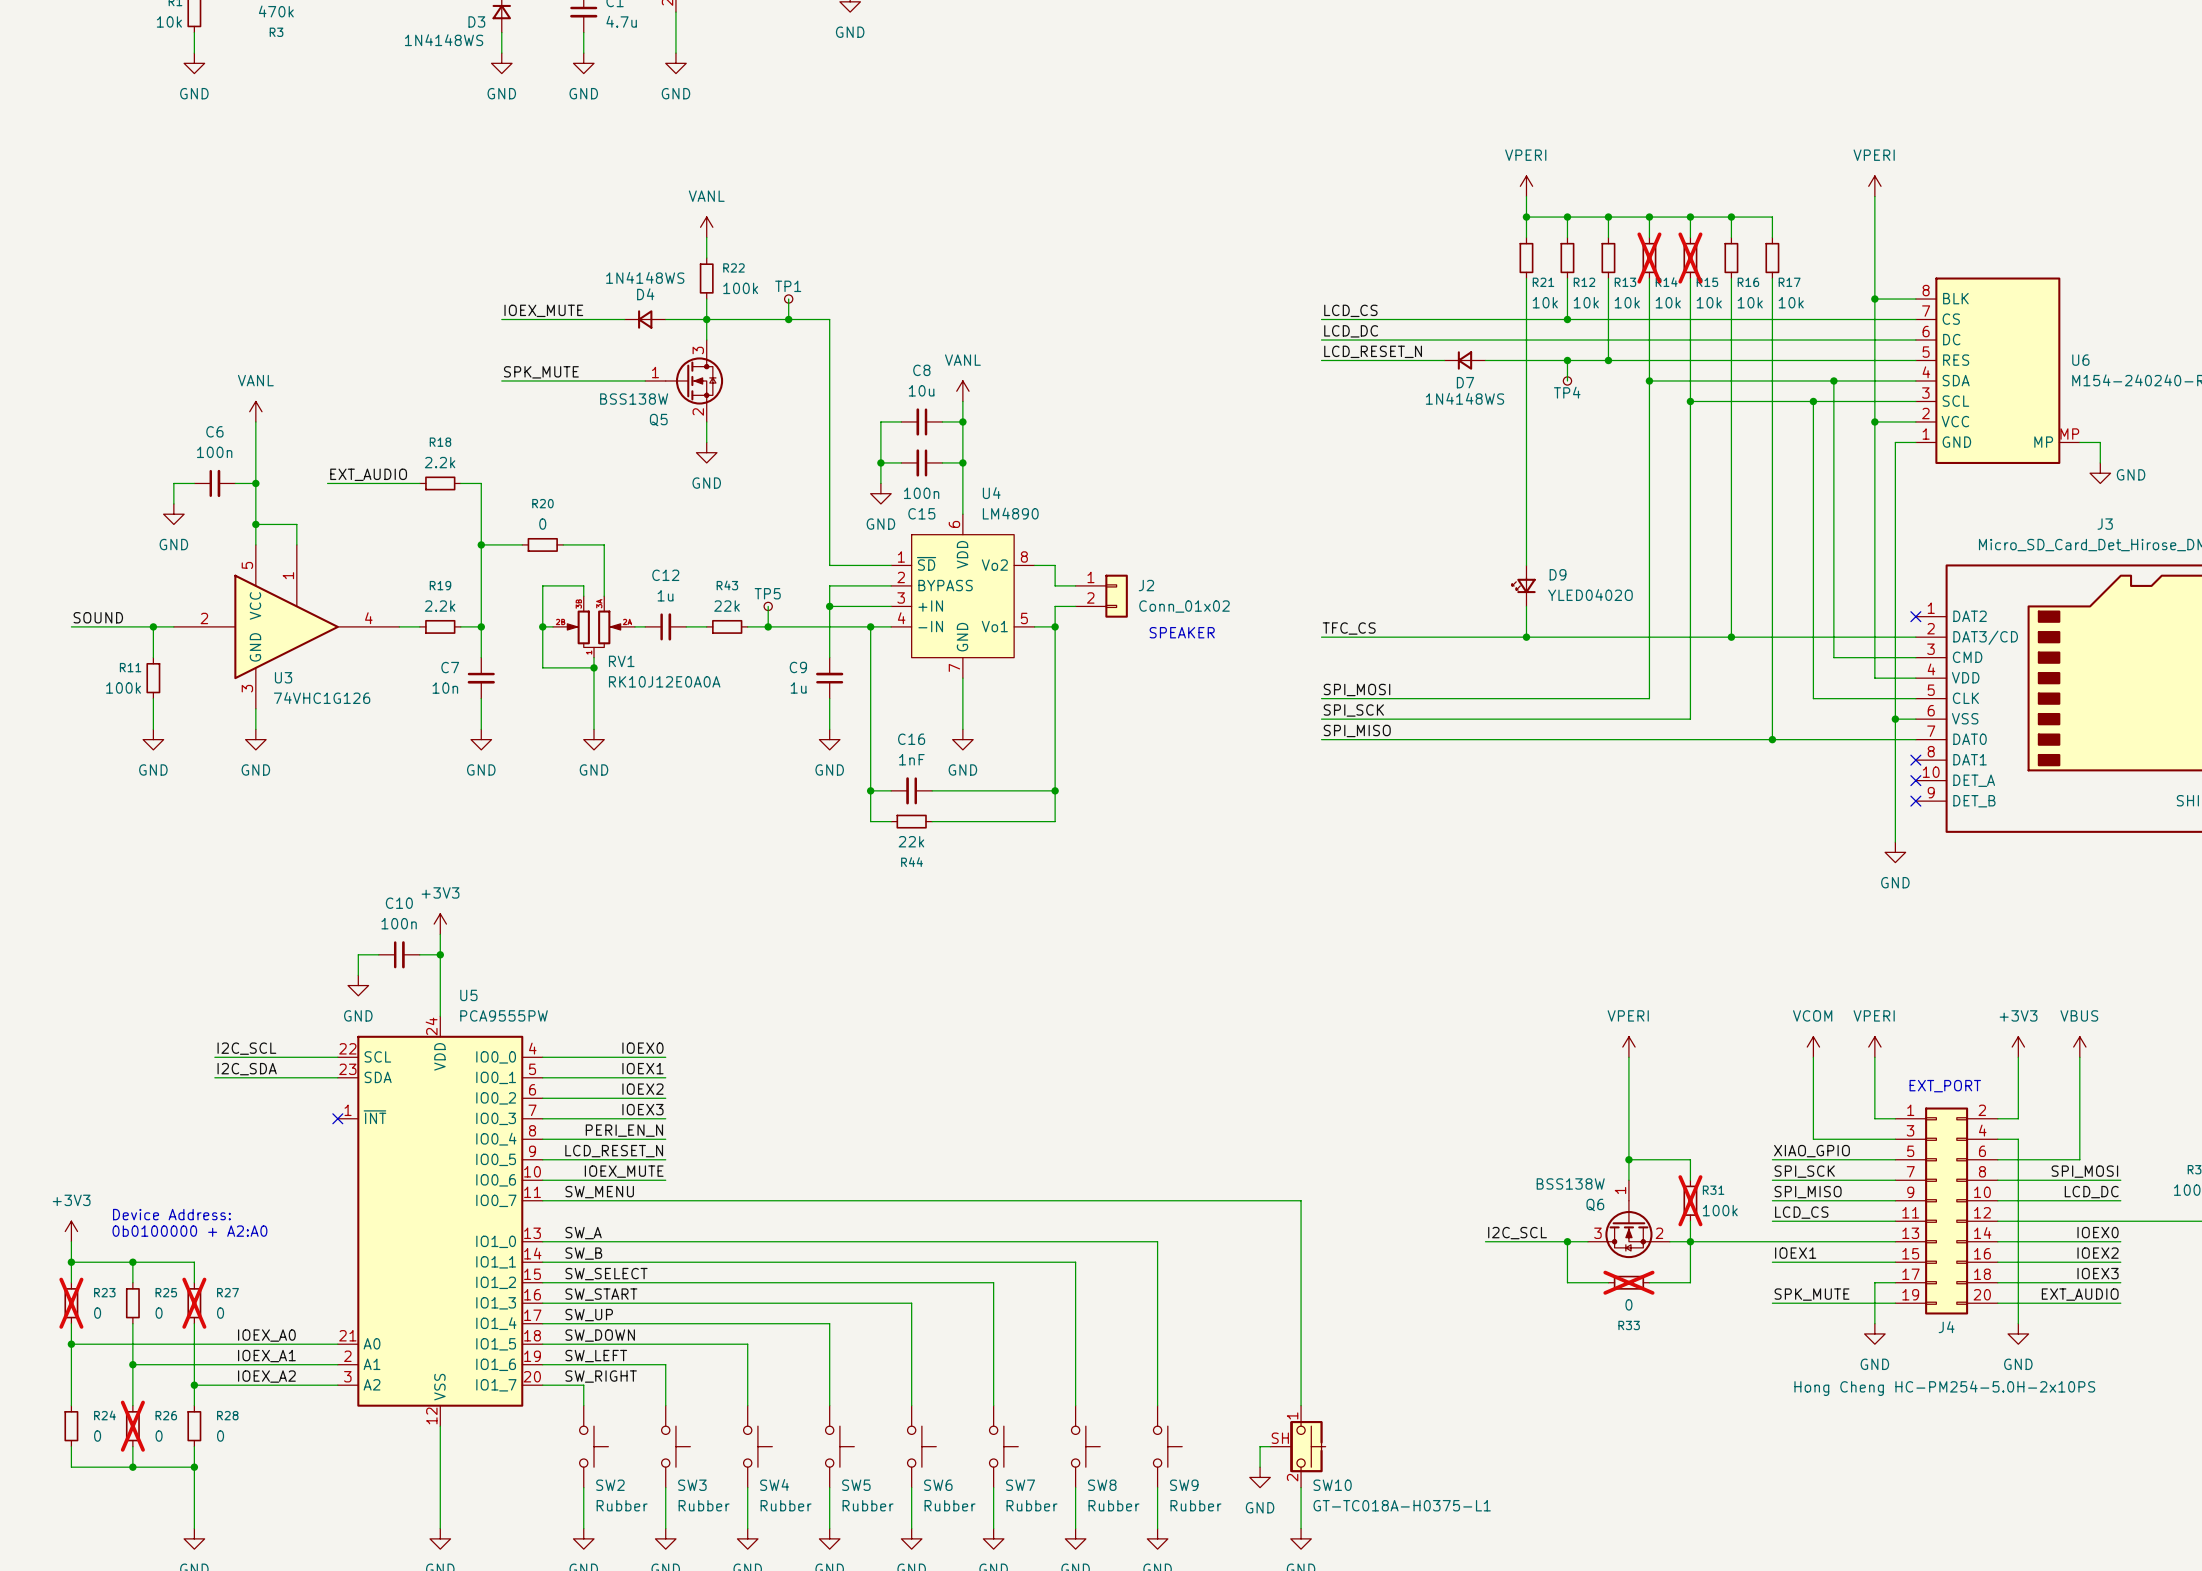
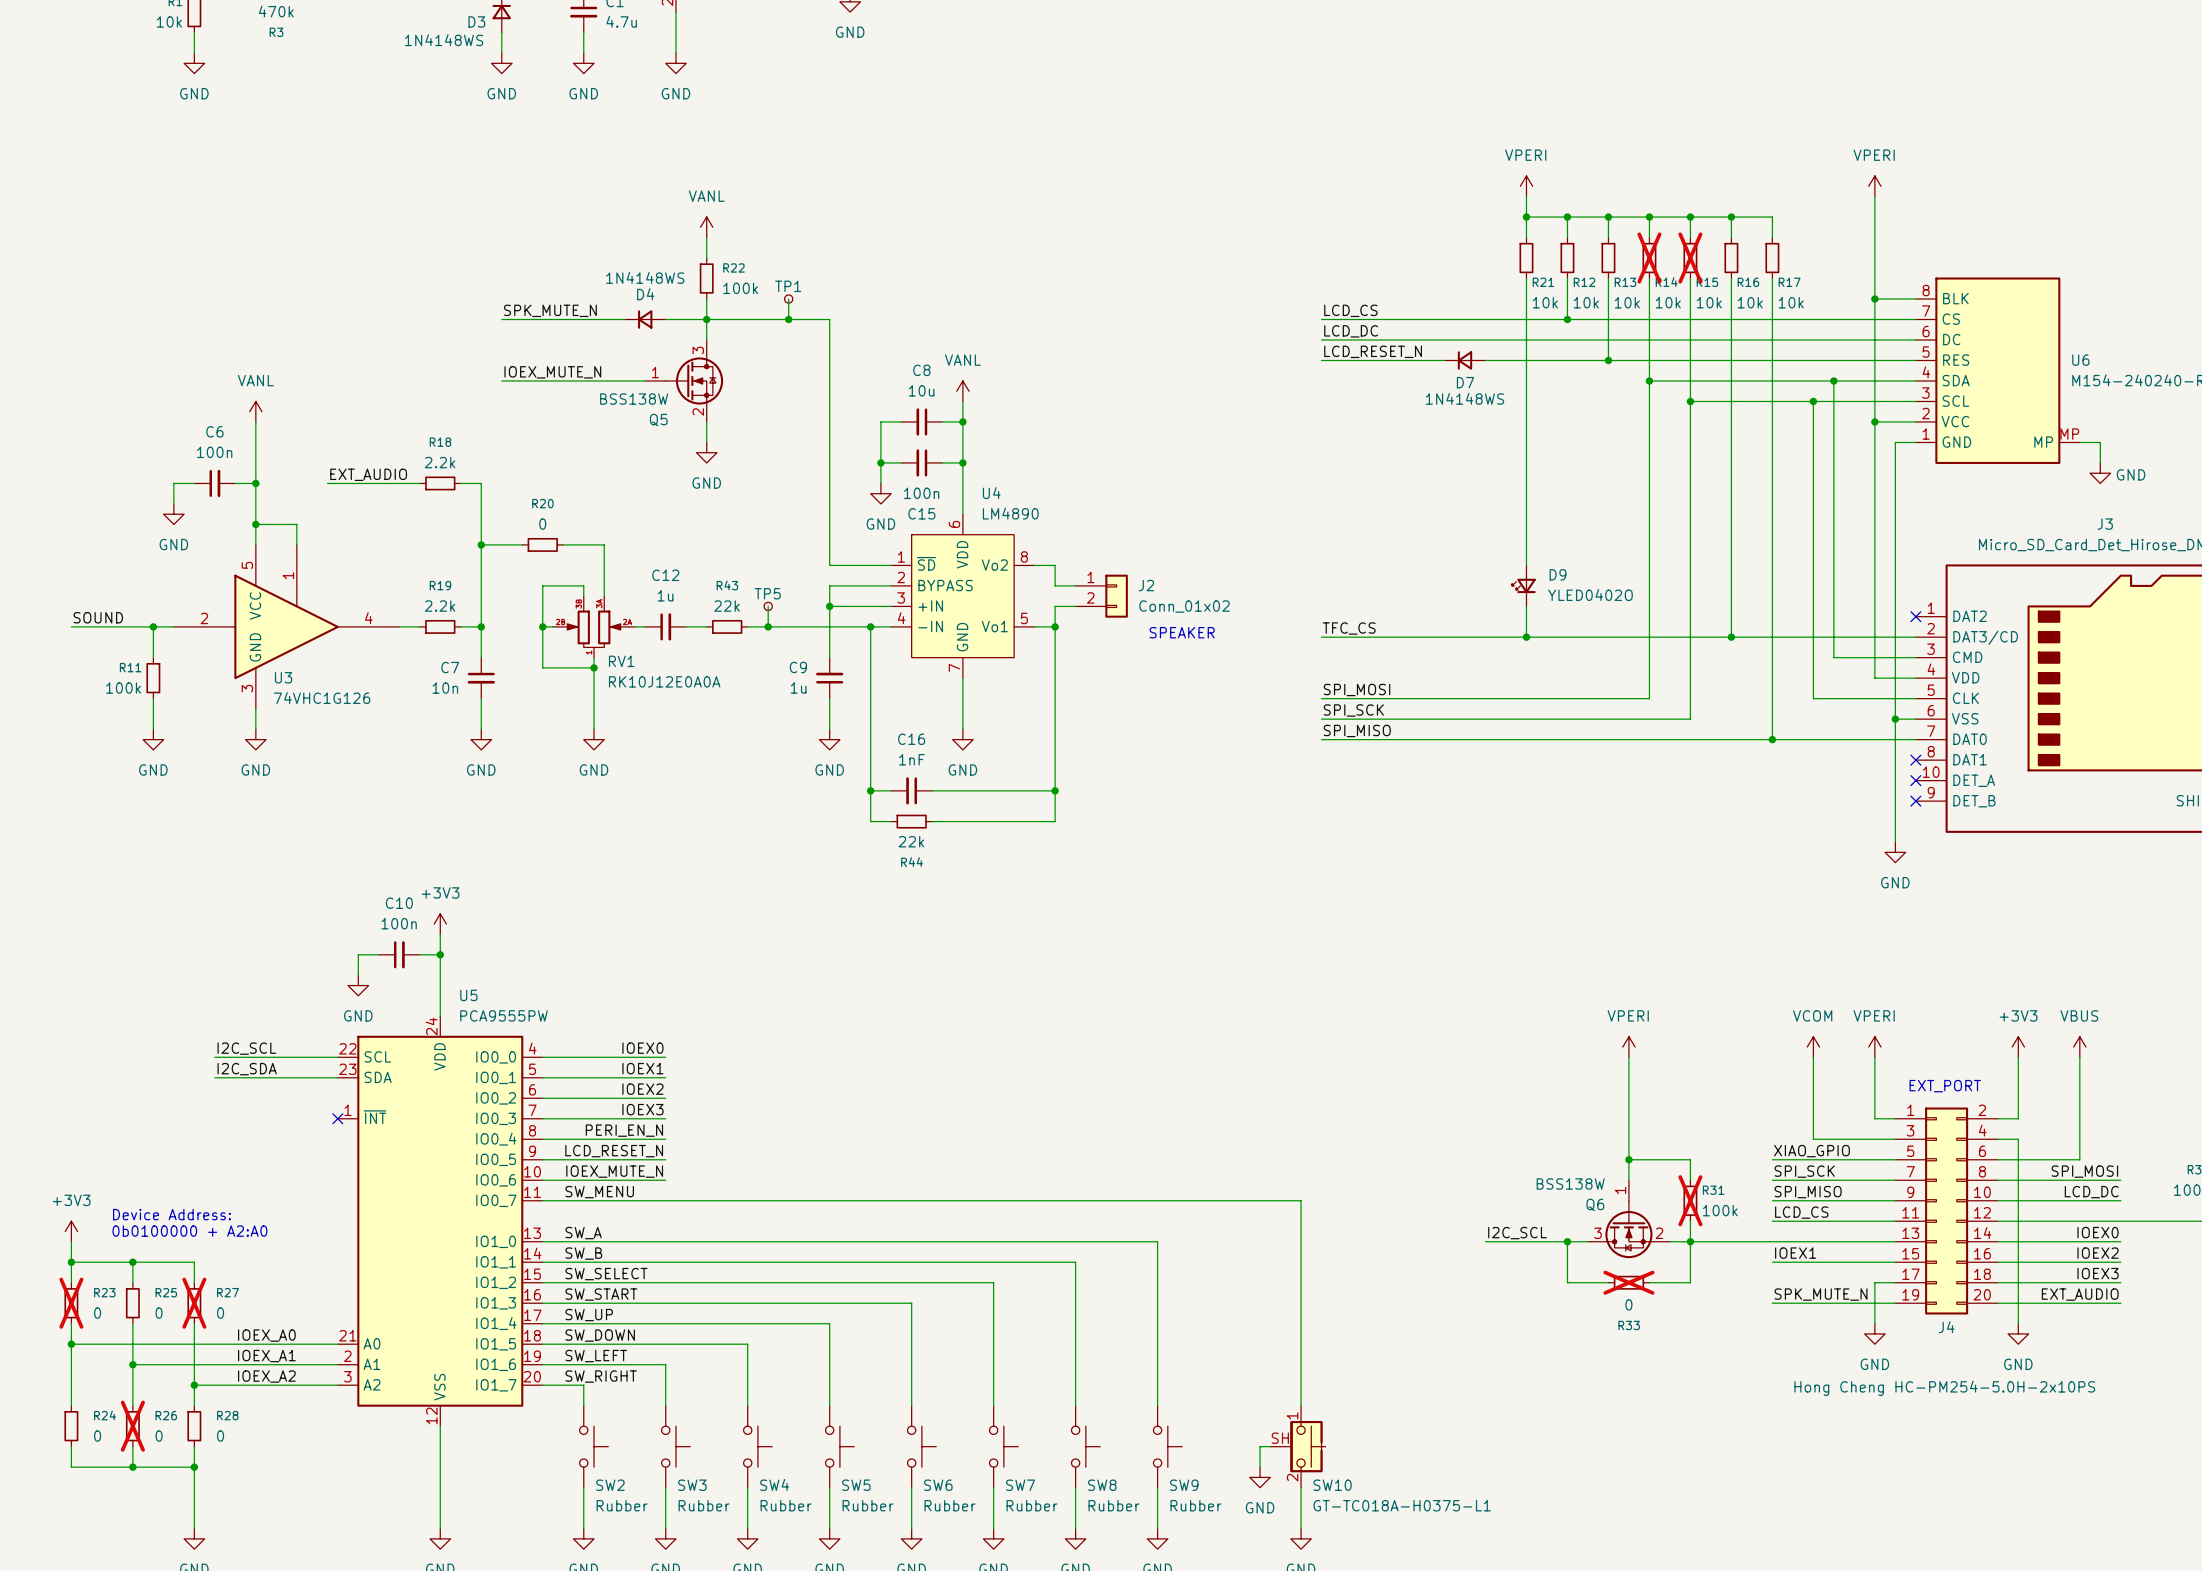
label: IOEX_MUTE (543, 310) -> SPK_MUTE_N (550, 310)
wire: (1567, 360) (1567, 380) -> none
junction: (1567, 360) -> none
label: SPK_MUTE (541, 372) -> IOEX_MUTE_N (552, 372)
TP4: (1567, 380) -> none
label: IOEX_MUTE (624, 1171) -> IOEX_MUTE_N (614, 1171)
label: SPK_MUTE (1812, 1294) -> SPK_MUTE_N (1821, 1294)

